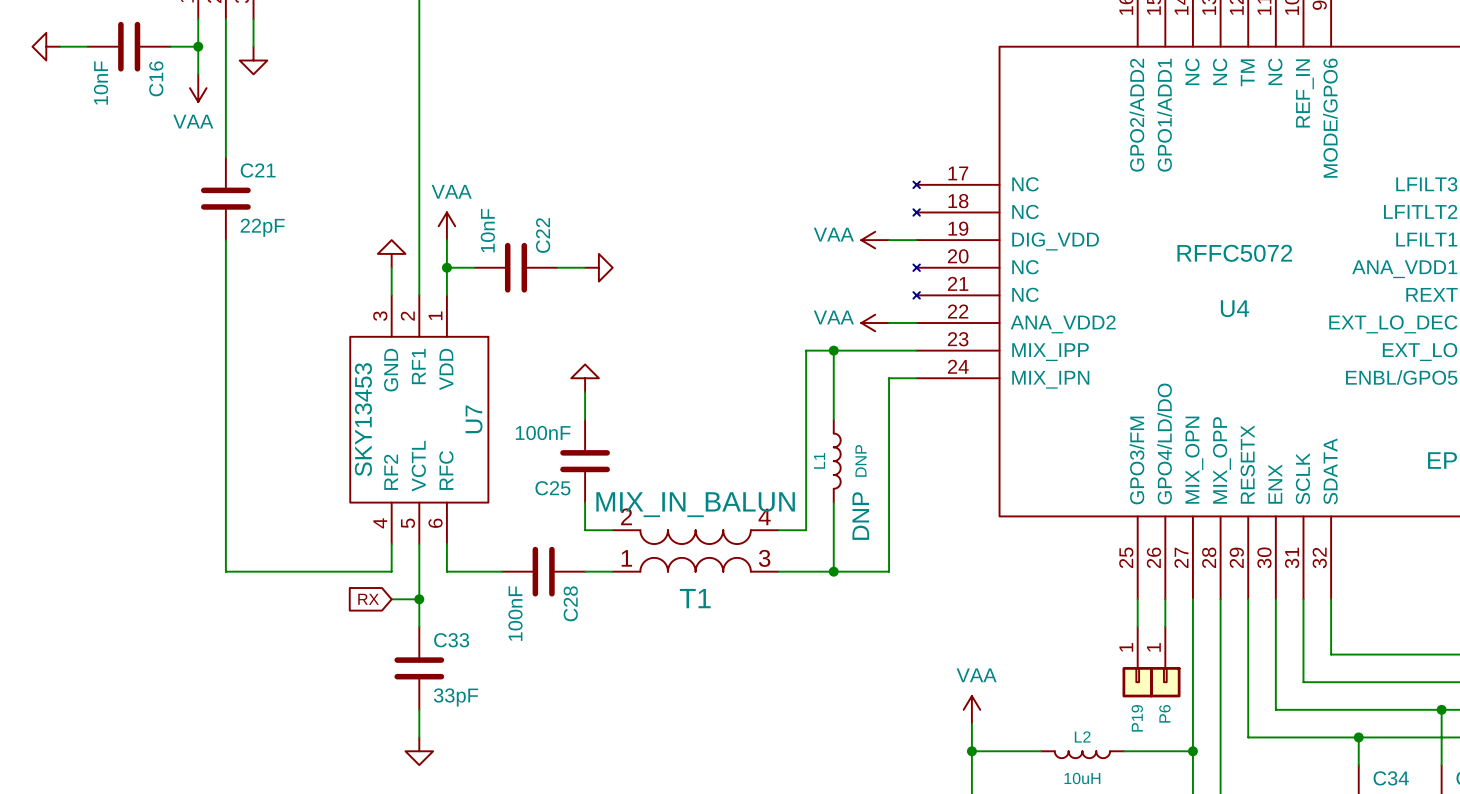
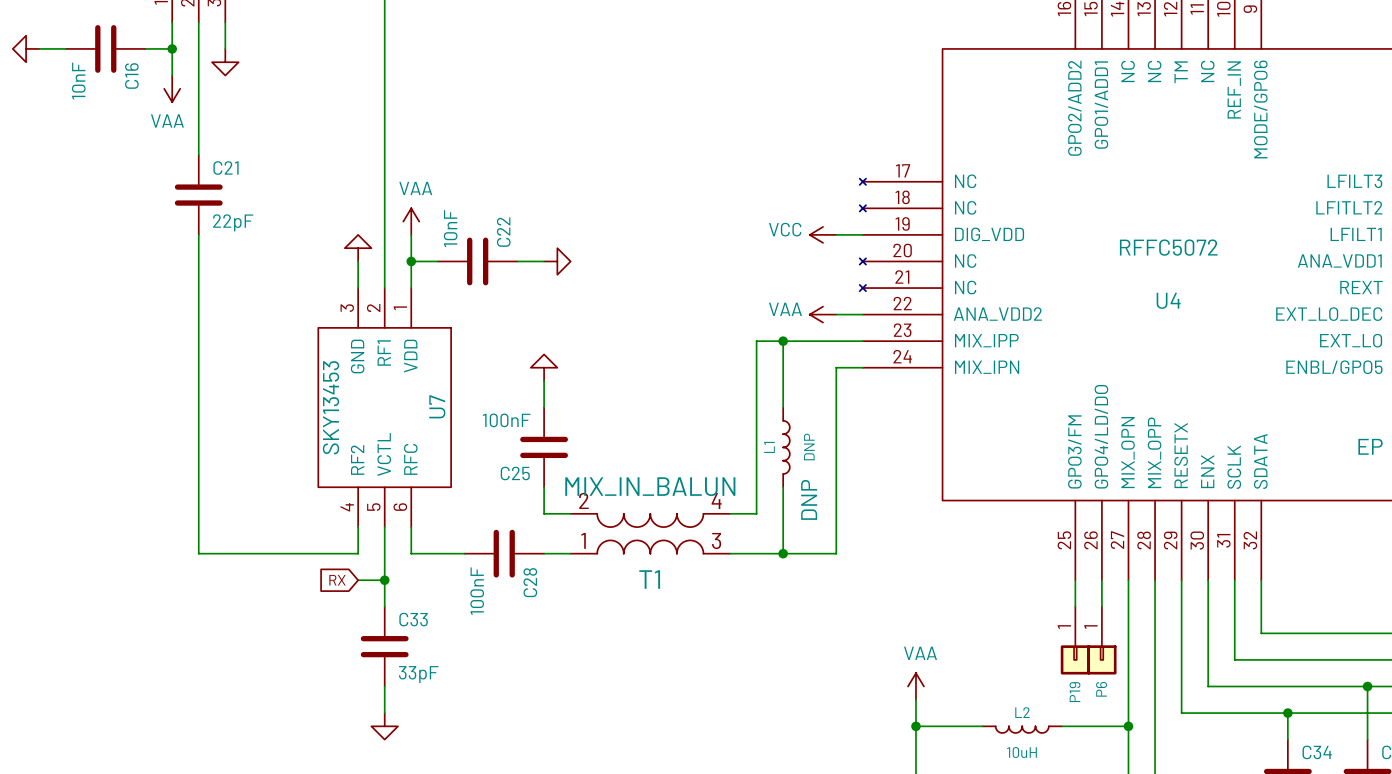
power symbol: VAA (875, 240) -> VCC (823, 234)

